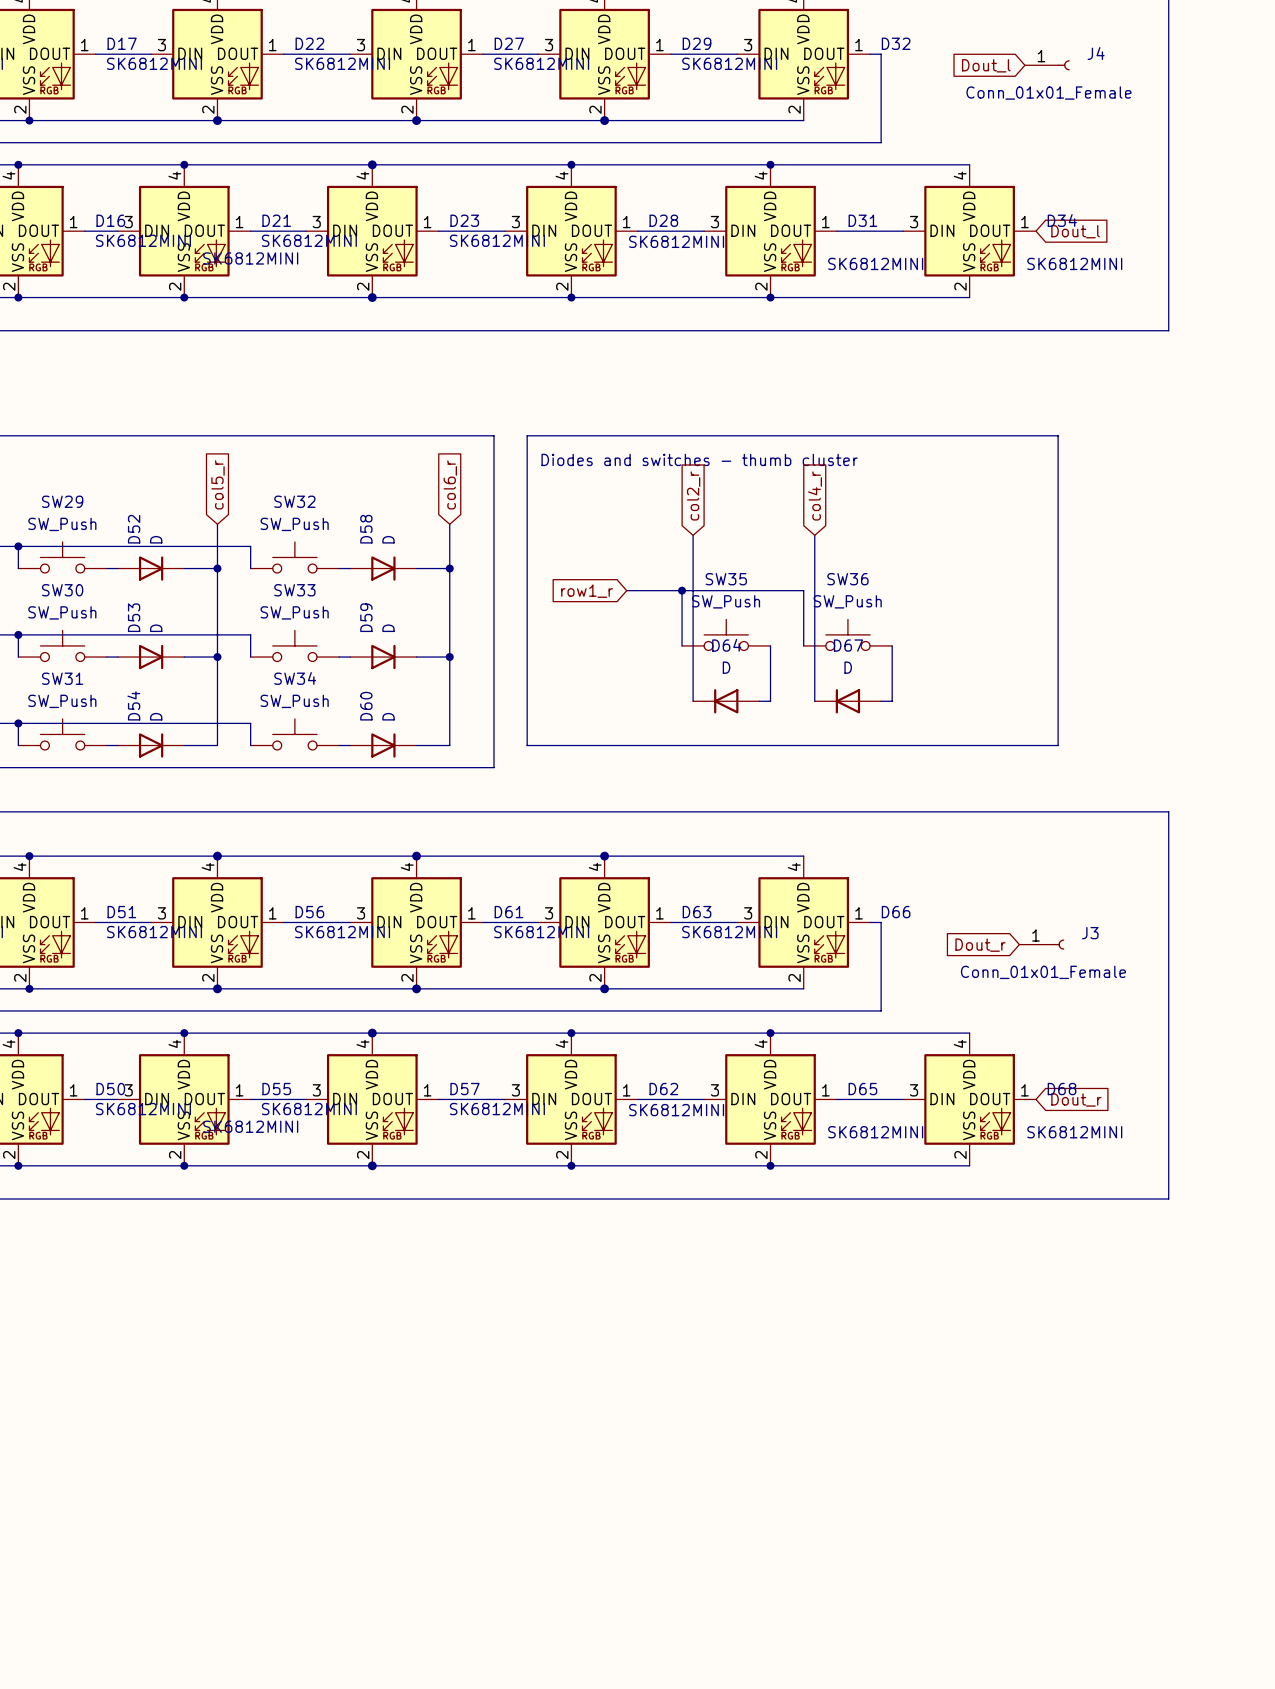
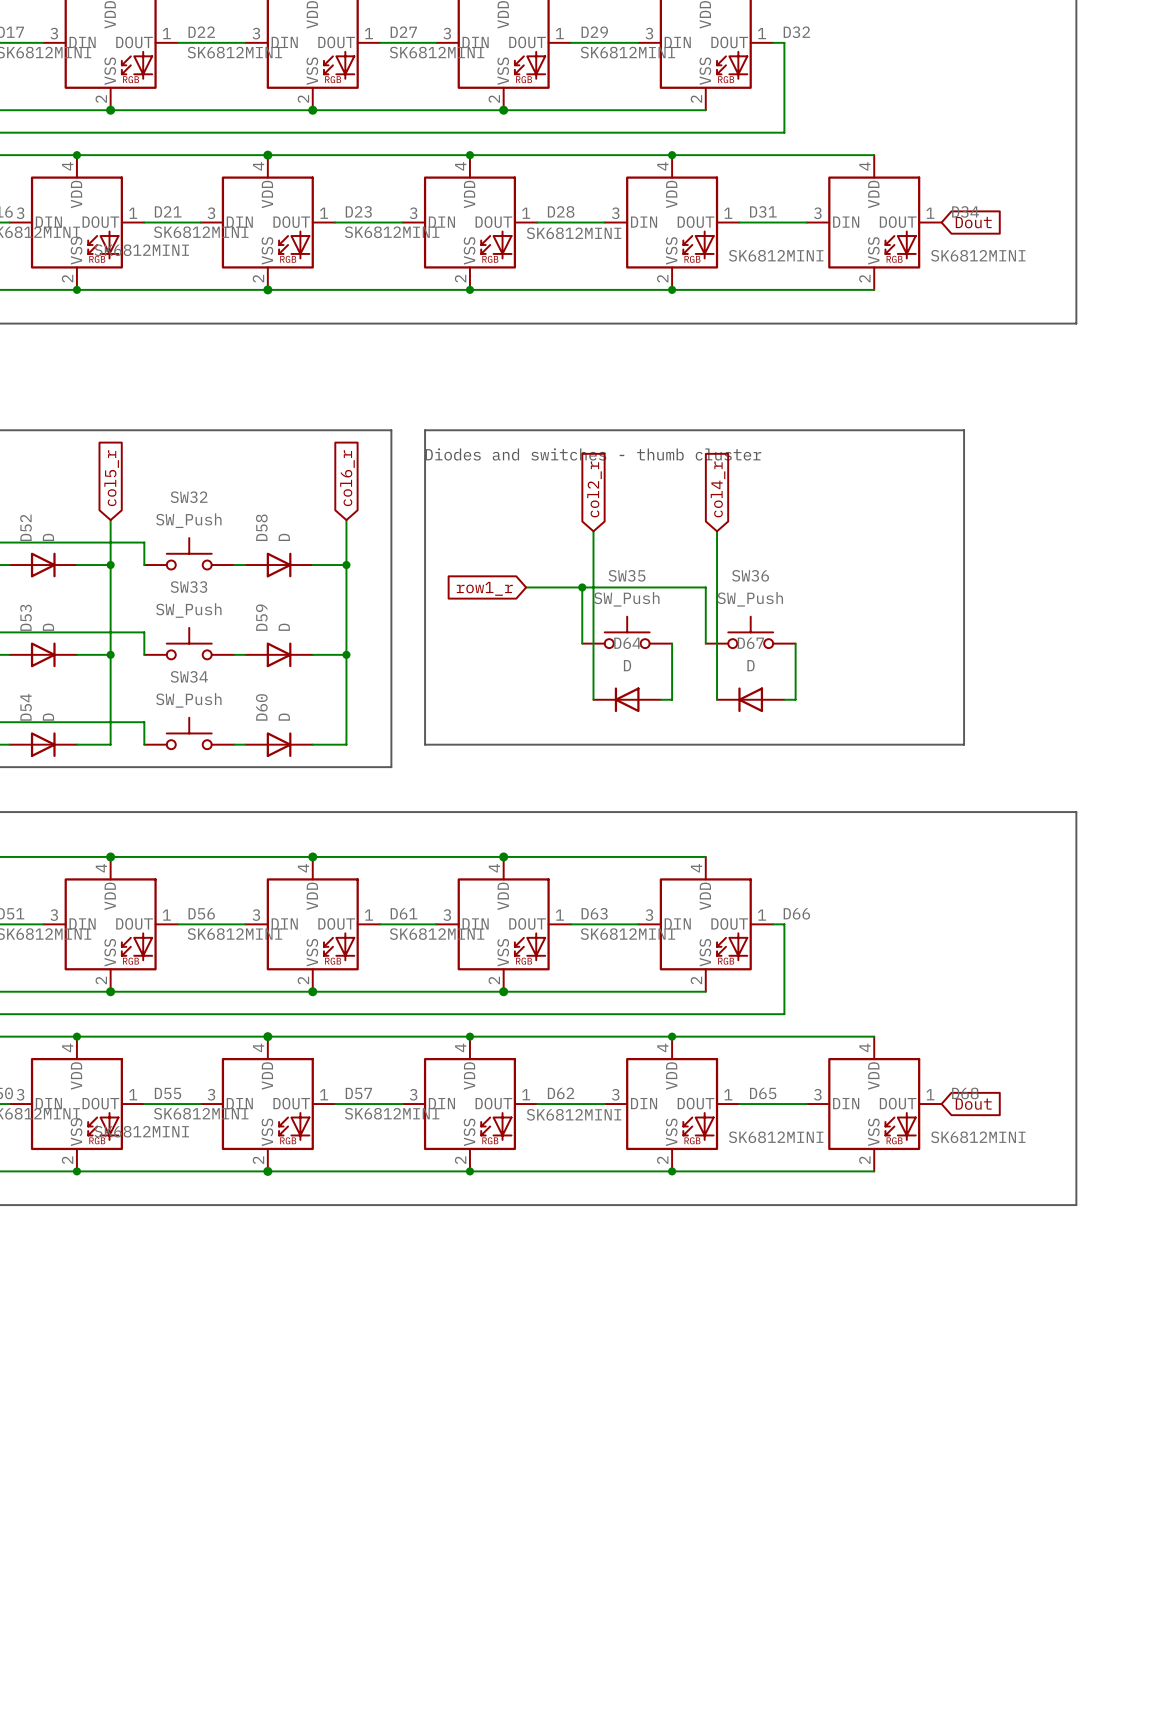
global label: Dout_l (986, 65) -> none
J4: Conn_01x01_Female (1047, 65) -> none
global label: Dout_l (1075, 231) -> Dout (973, 222)
J3: Conn_01x01_Female (1041, 944) -> none
global label: Dout_r (980, 945) -> none
global label: Dout_r (1076, 1099) -> Dout (973, 1104)

